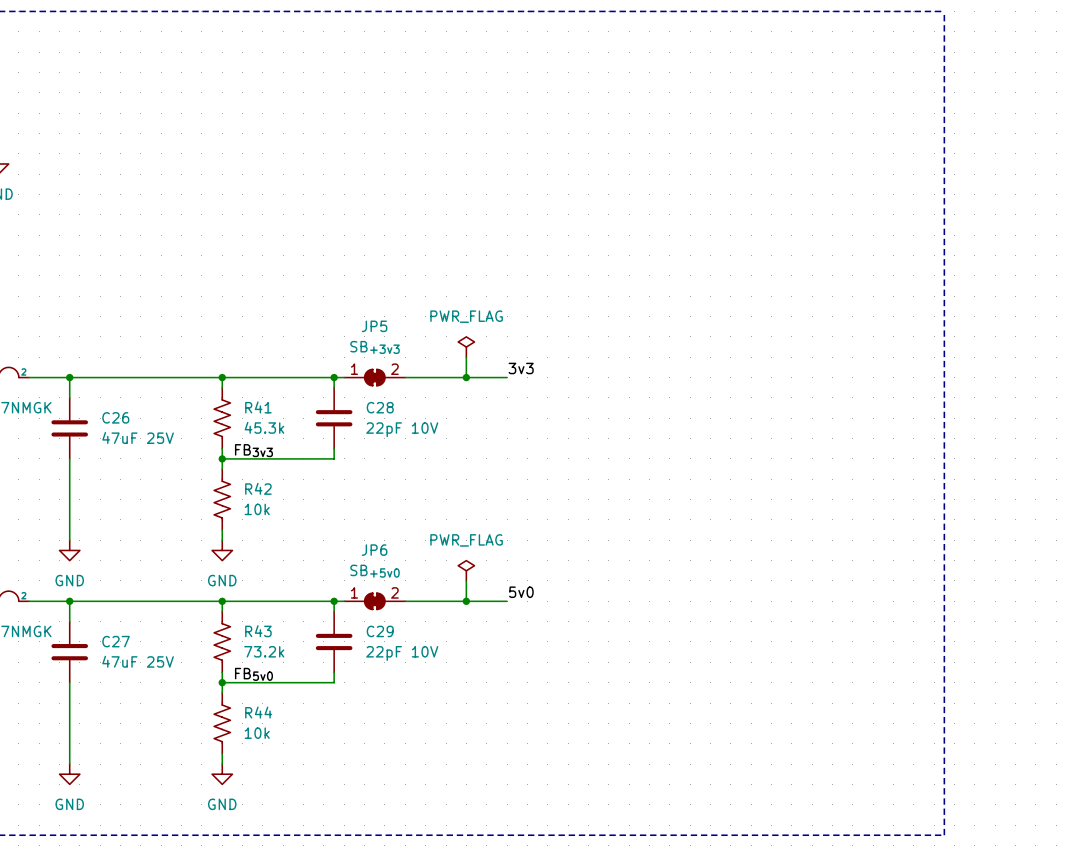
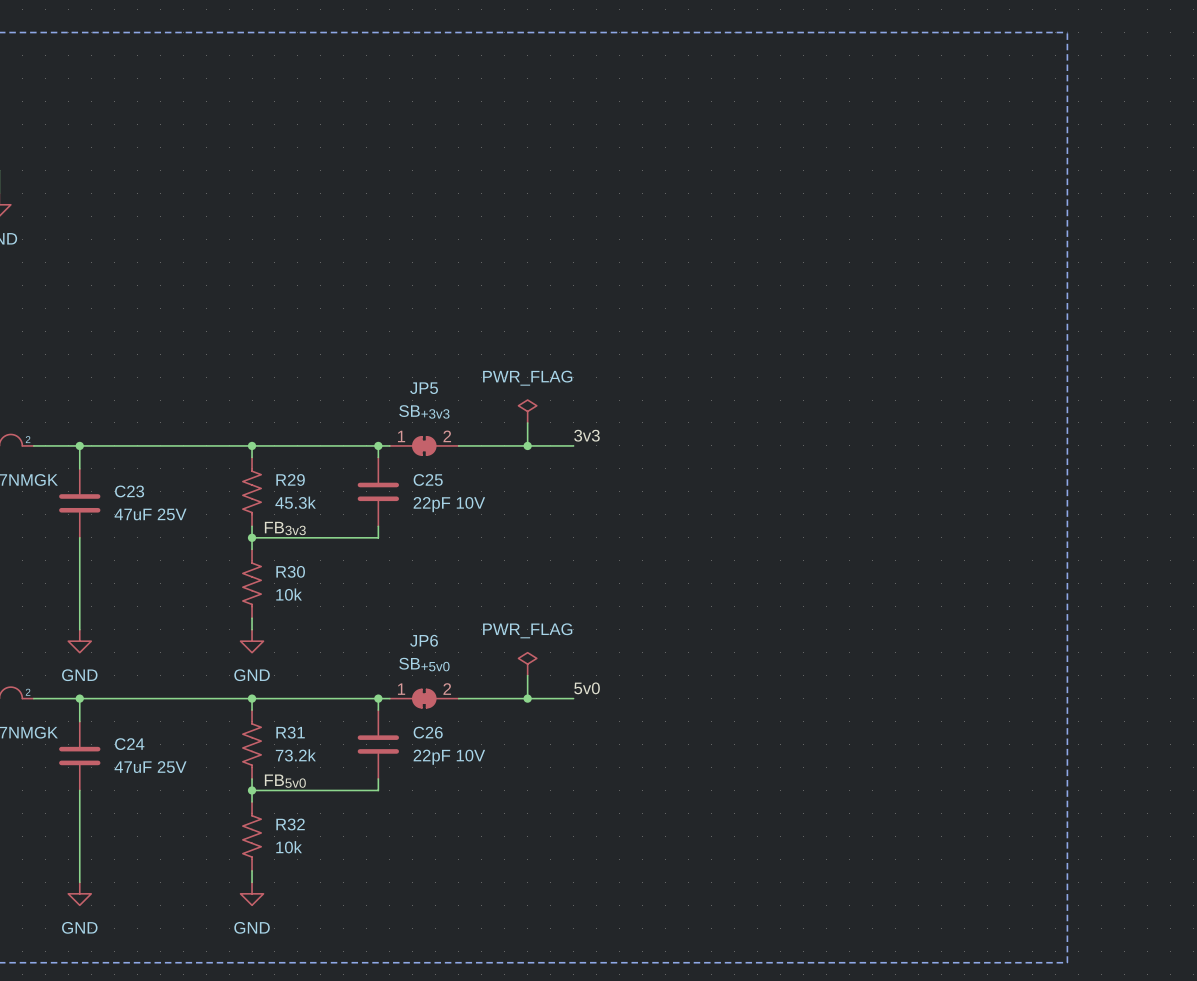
R41 name: R41 (258, 407) -> R29 (290, 479)
C28 name: C28 (380, 407) -> C25 (428, 479)
C26 name: C26 (115, 417) -> C23 (129, 491)
R42 name: R42 (258, 488) -> R30 (290, 571)
R43 name: R43 (258, 631) -> R31 (290, 732)
C29 name: C29 (380, 631) -> C26 (428, 732)
C27 name: C27 (116, 641) -> C24 (129, 744)
R44 name: R44 (258, 712) -> R32 (290, 824)

